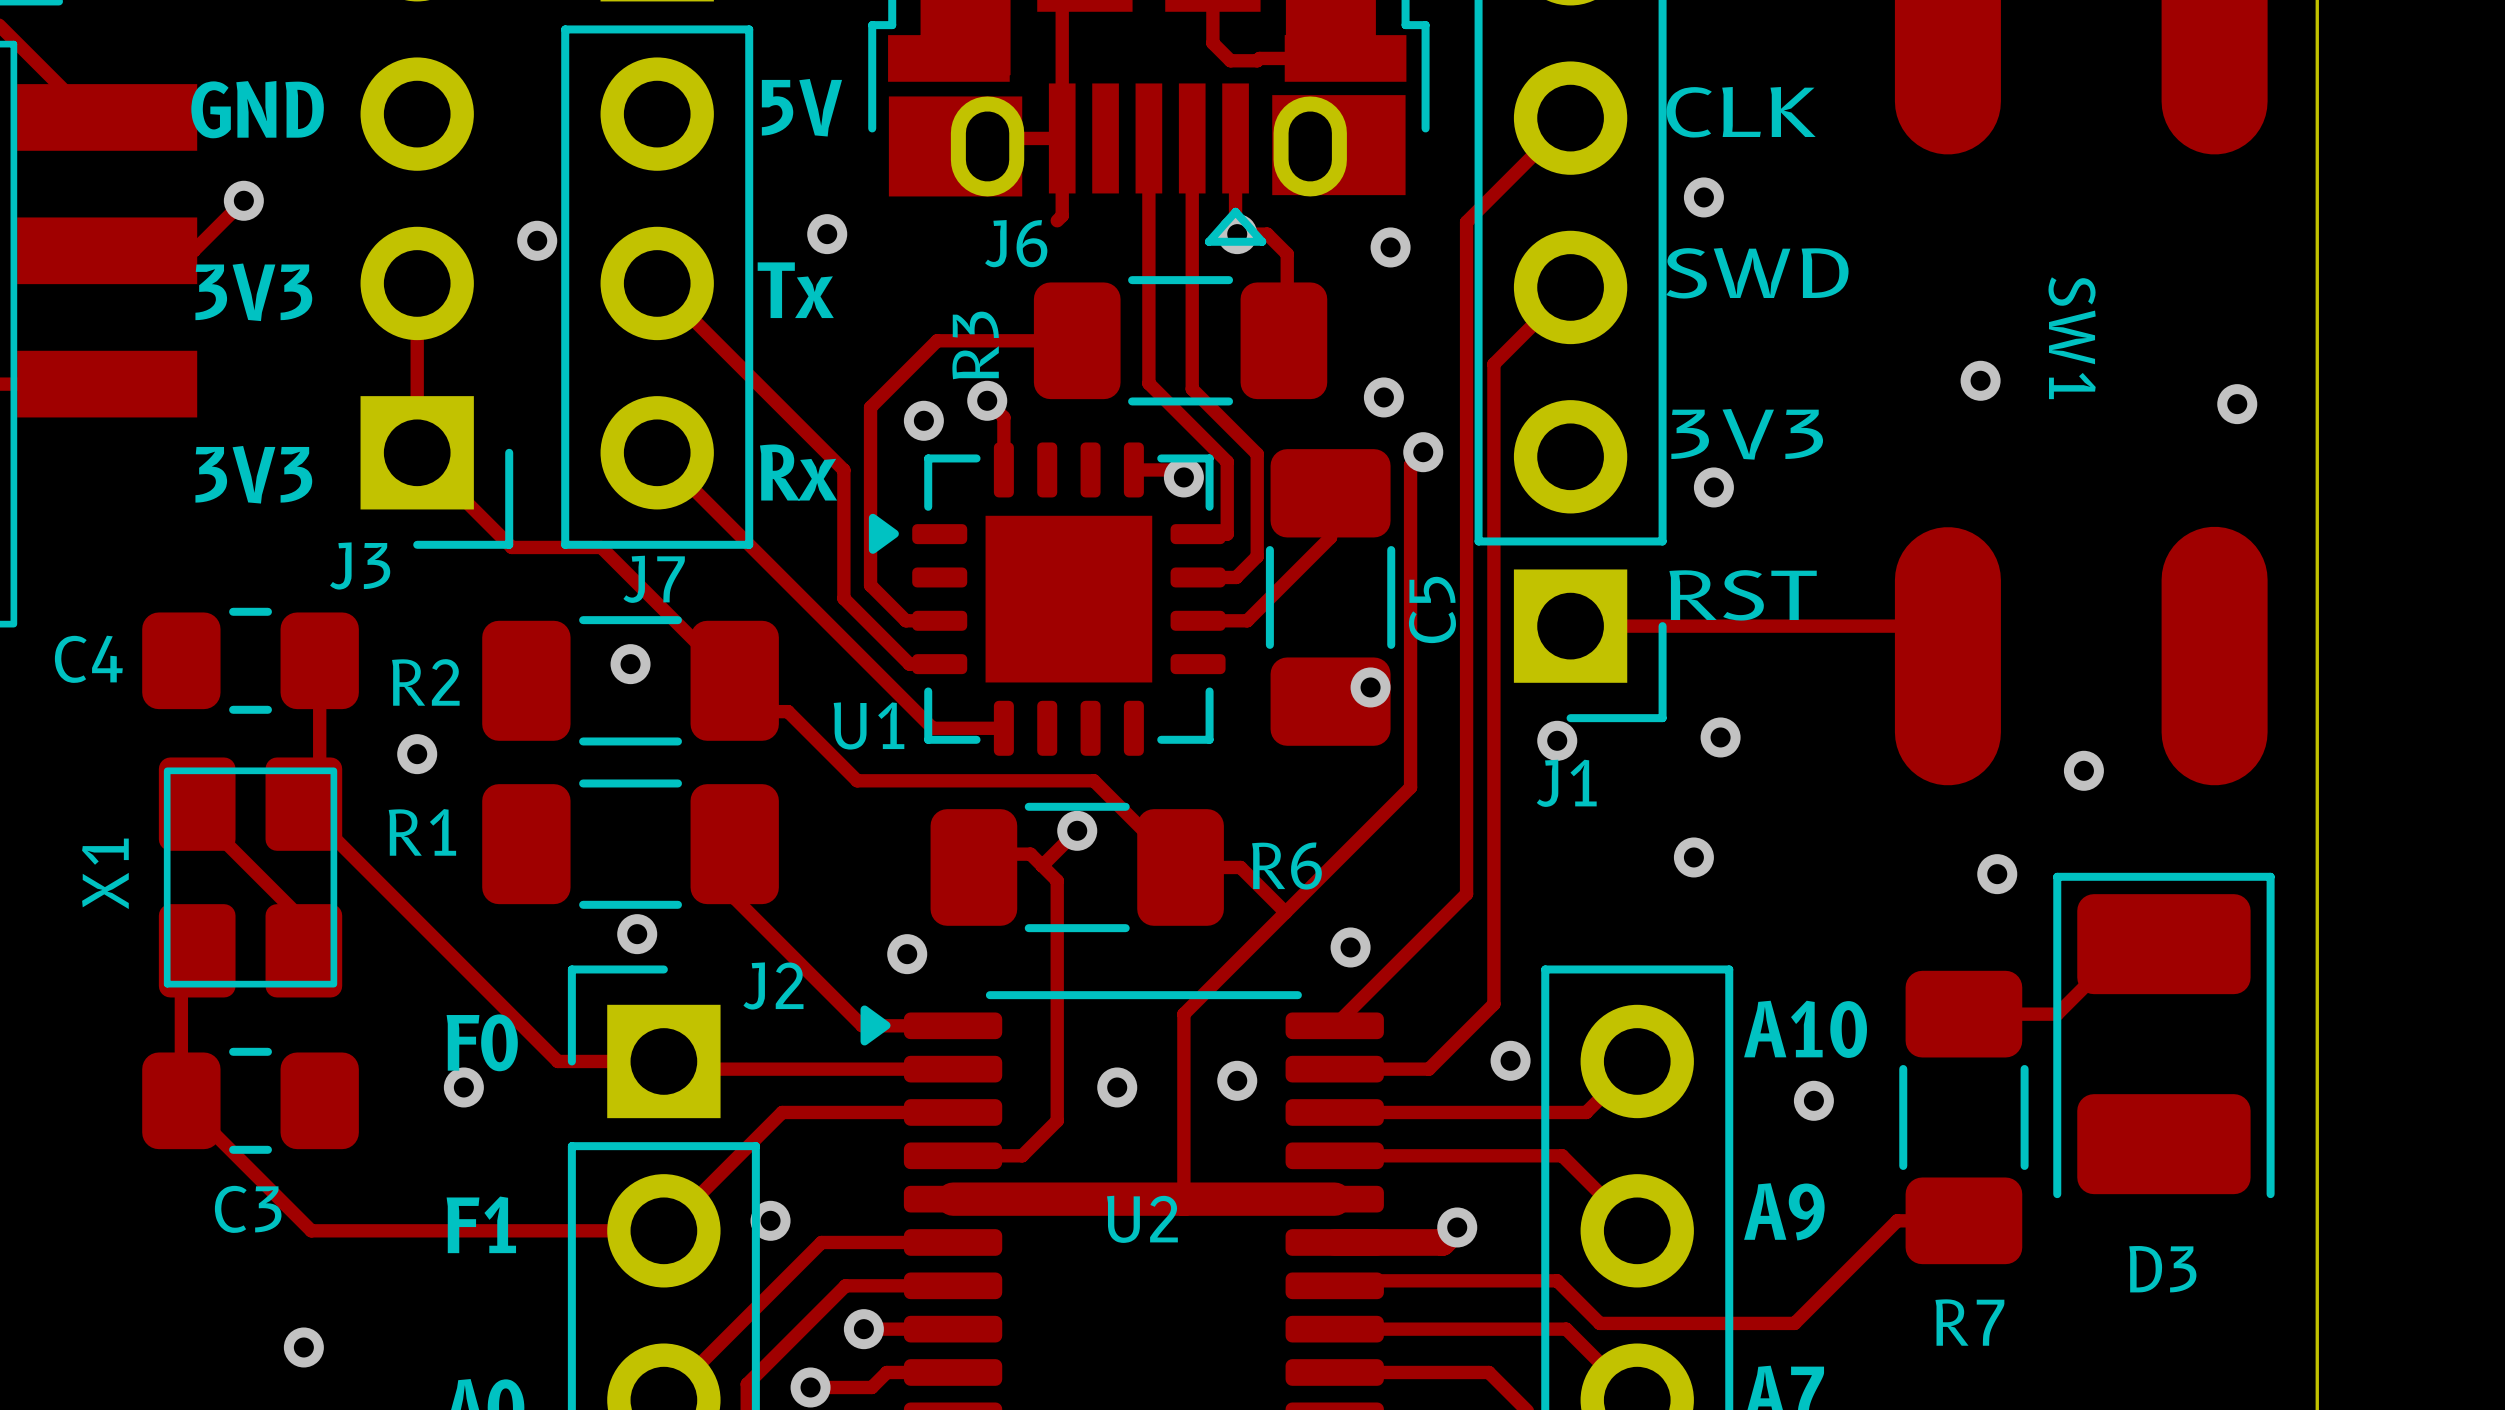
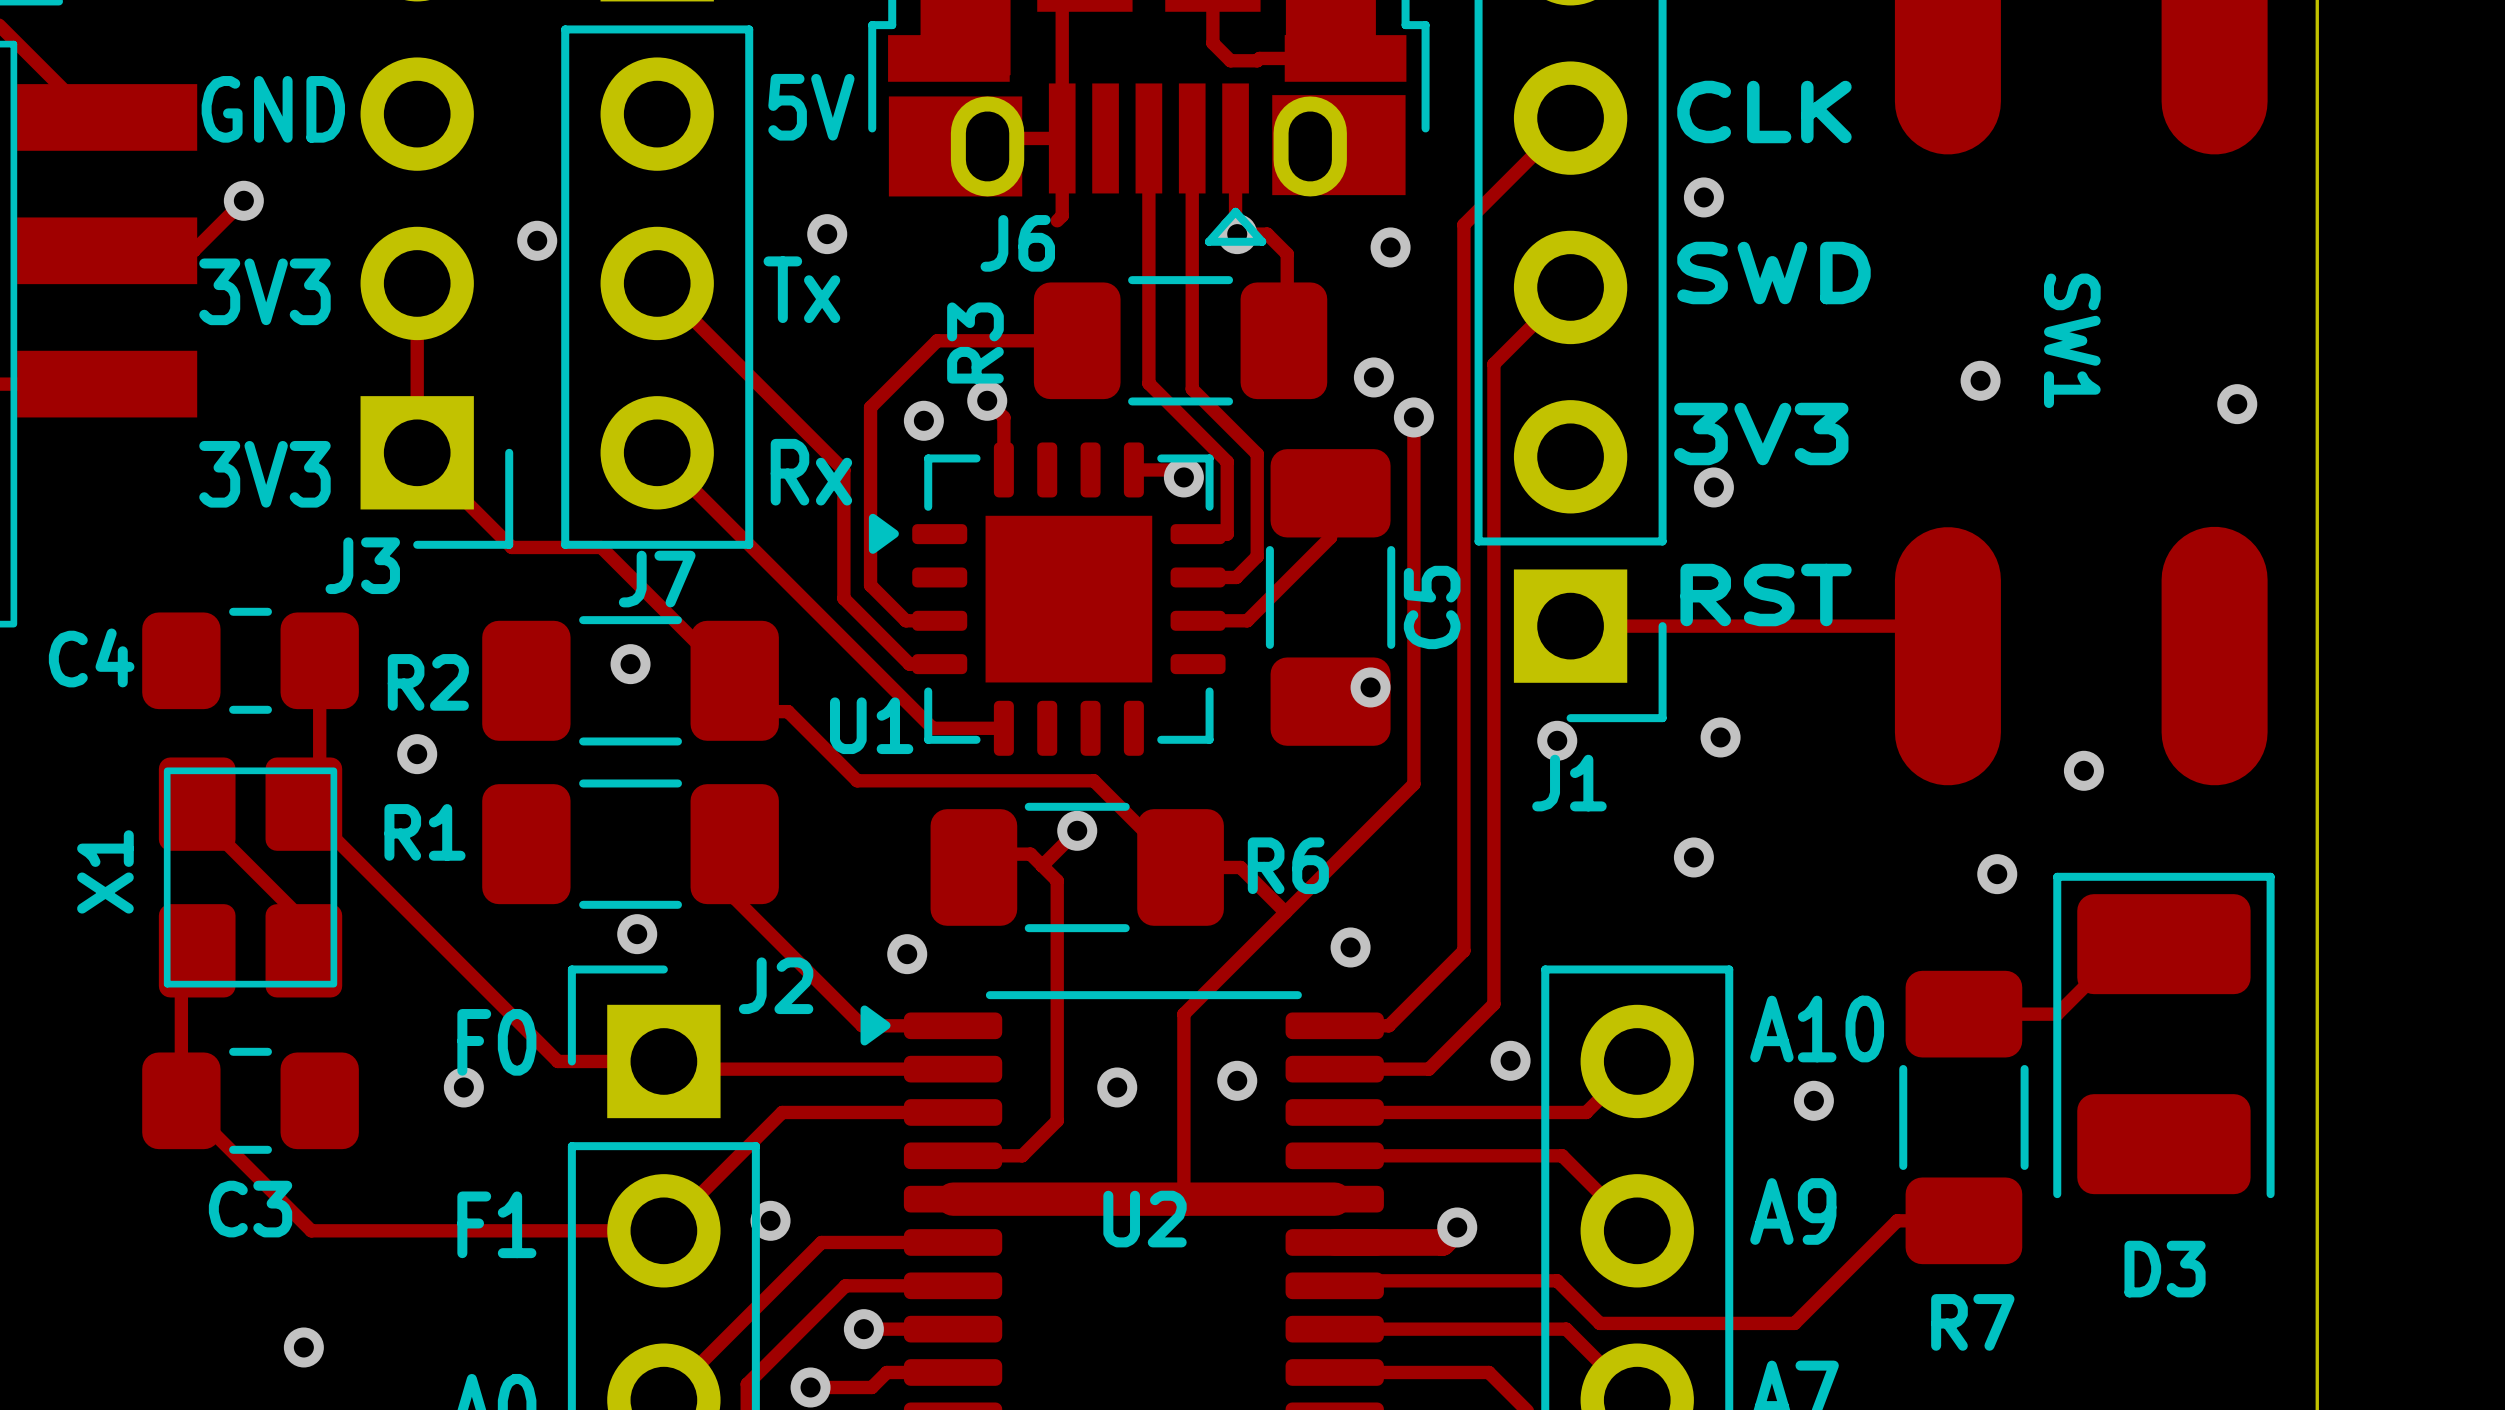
track: (1466, 222) (1466, 893) (1334, 1025) -> (1466, 222) (1463, 224) (1463, 950) (1388, 1025) (1334, 1025)
via: none -> (1373, 377)
via: (1383, 397) -> none
via: none -> (1413, 417)
track: (1423, 452) (1410, 464) (1410, 787) -> (1413, 417) (1413, 784) (1410, 787)
via: (1423, 452) -> none

